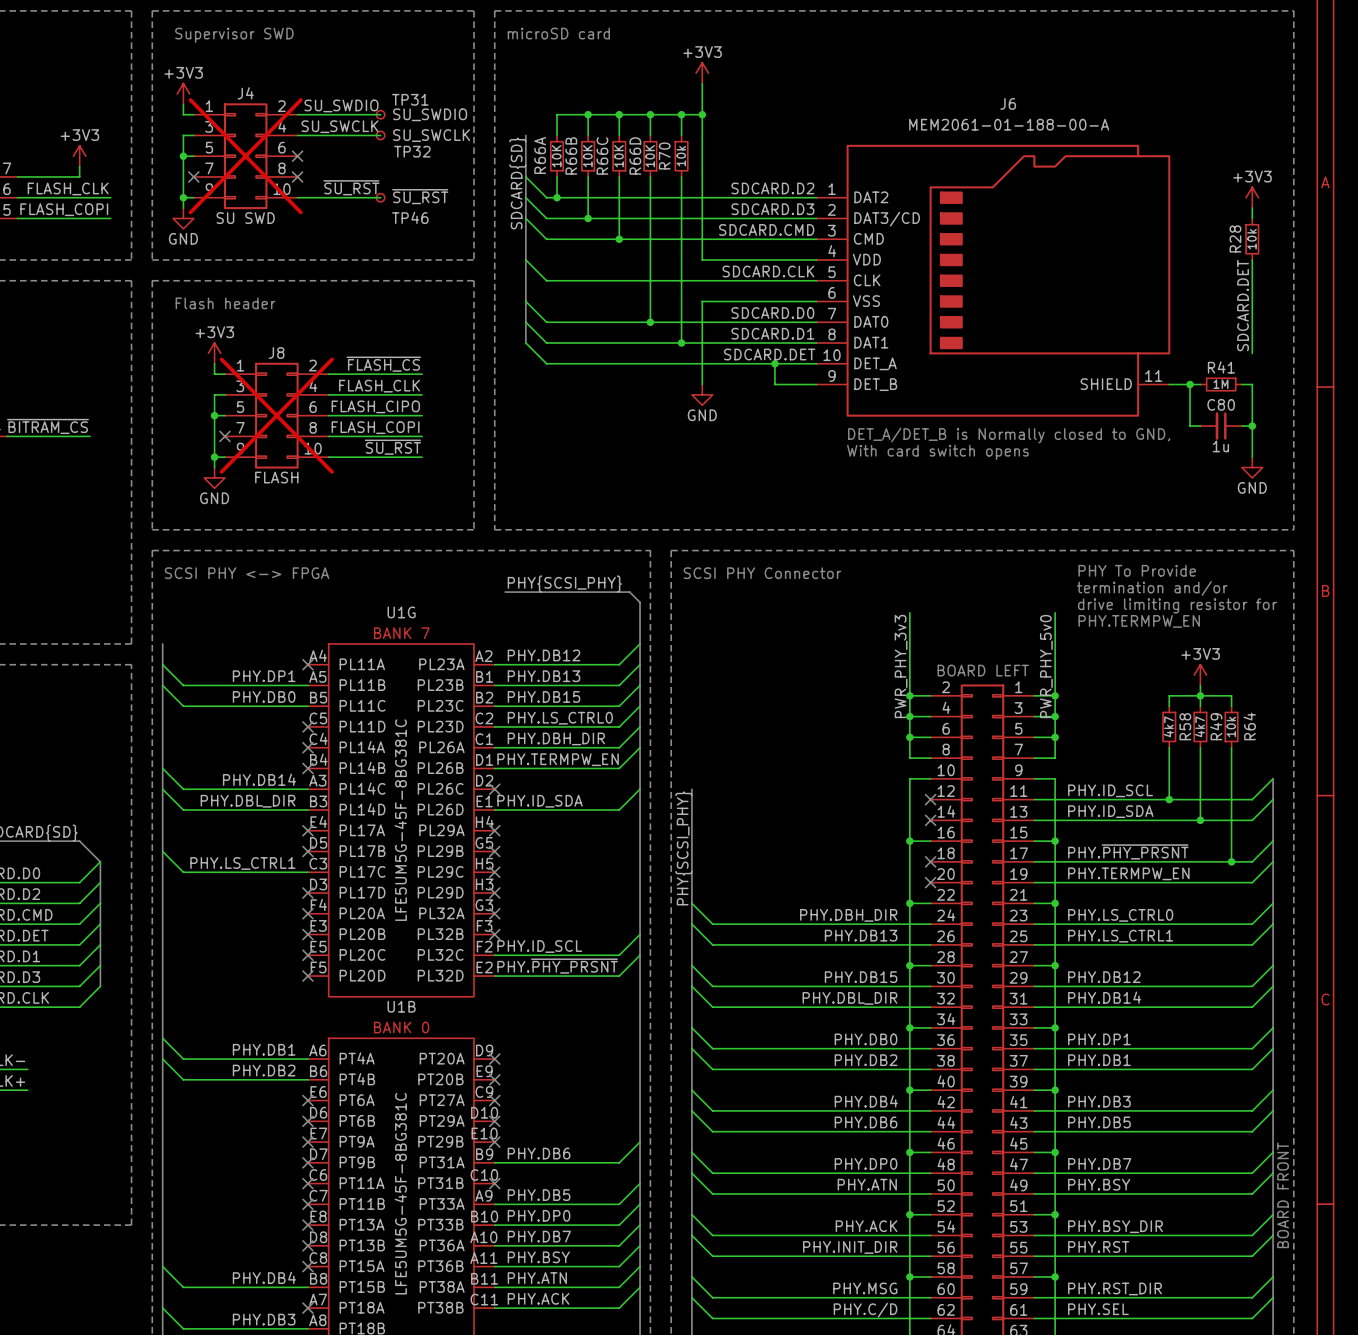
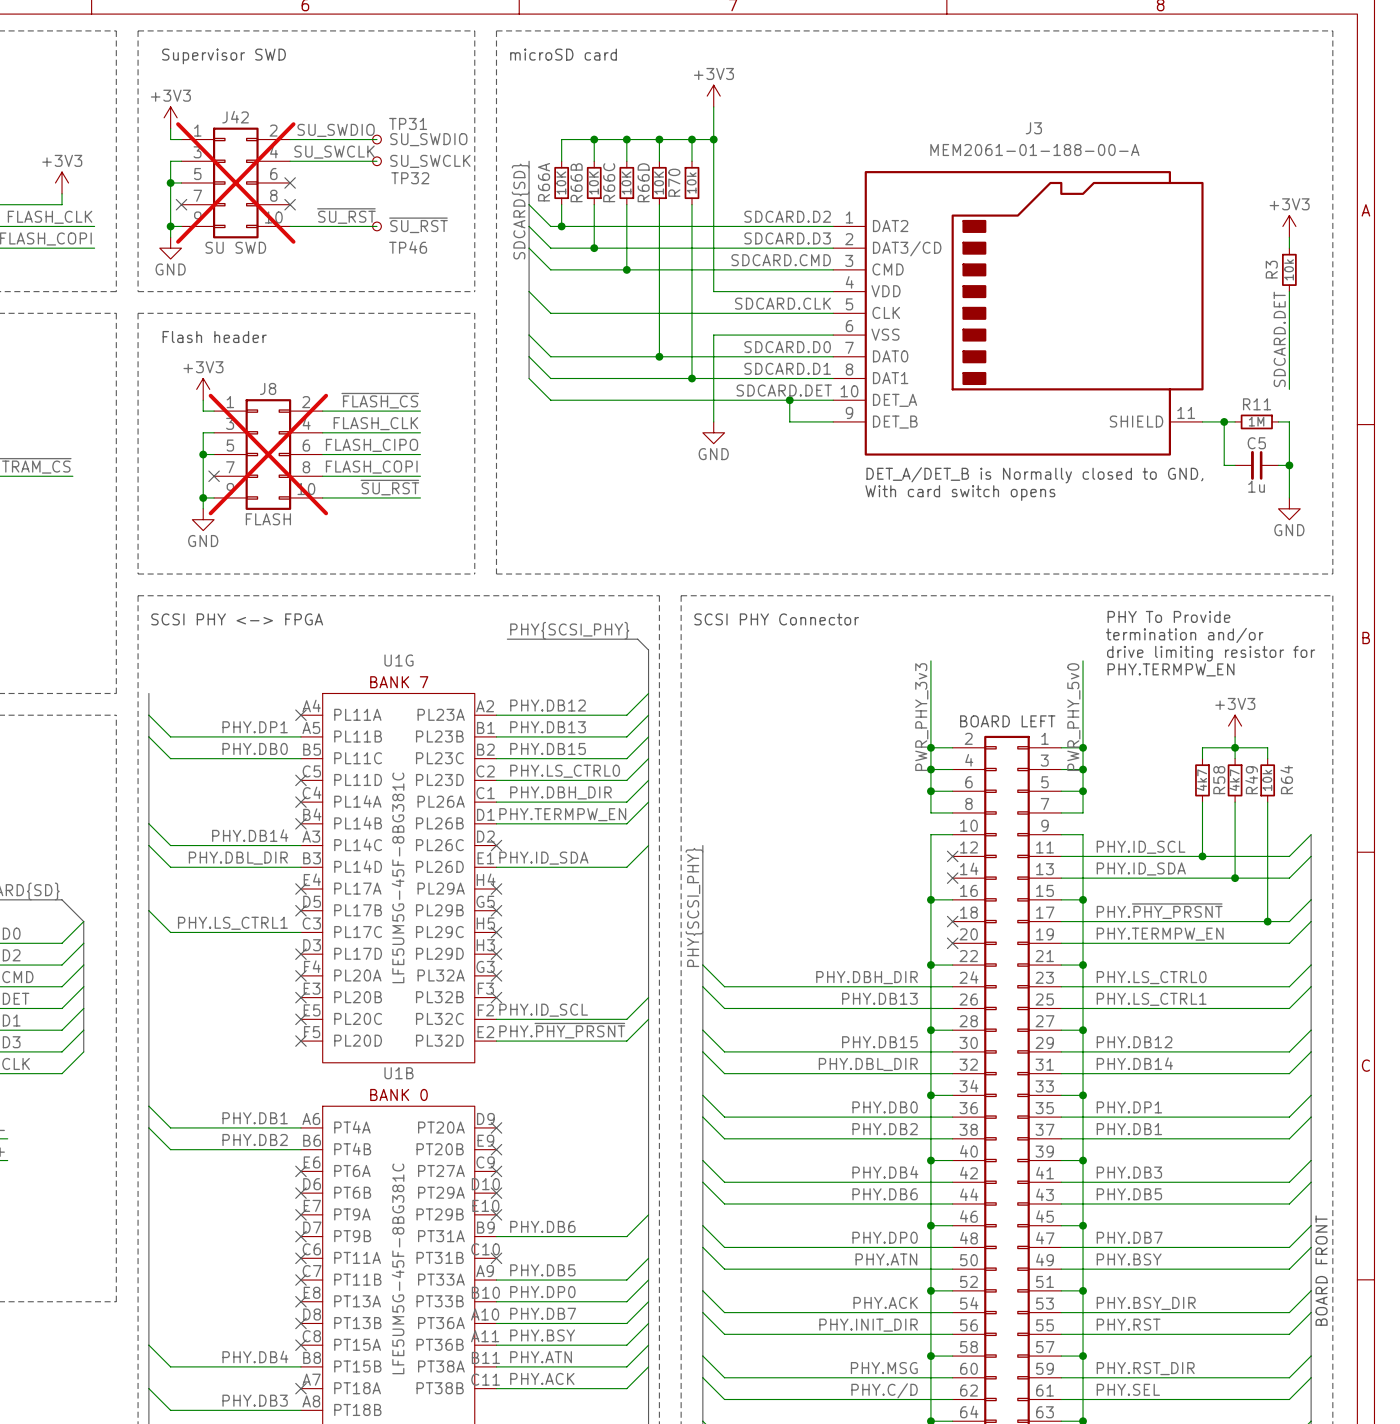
J4 name: J4 (245, 93) -> J42 (235, 117)
J6 name: J6 (1008, 103) -> J3 (1033, 128)
R28 name: R28 (1235, 238) -> R3 (1271, 269)
R41 name: R41 (1221, 367) -> R11 (1257, 404)
C80 name: C80 (1221, 404) -> C5 (1256, 443)

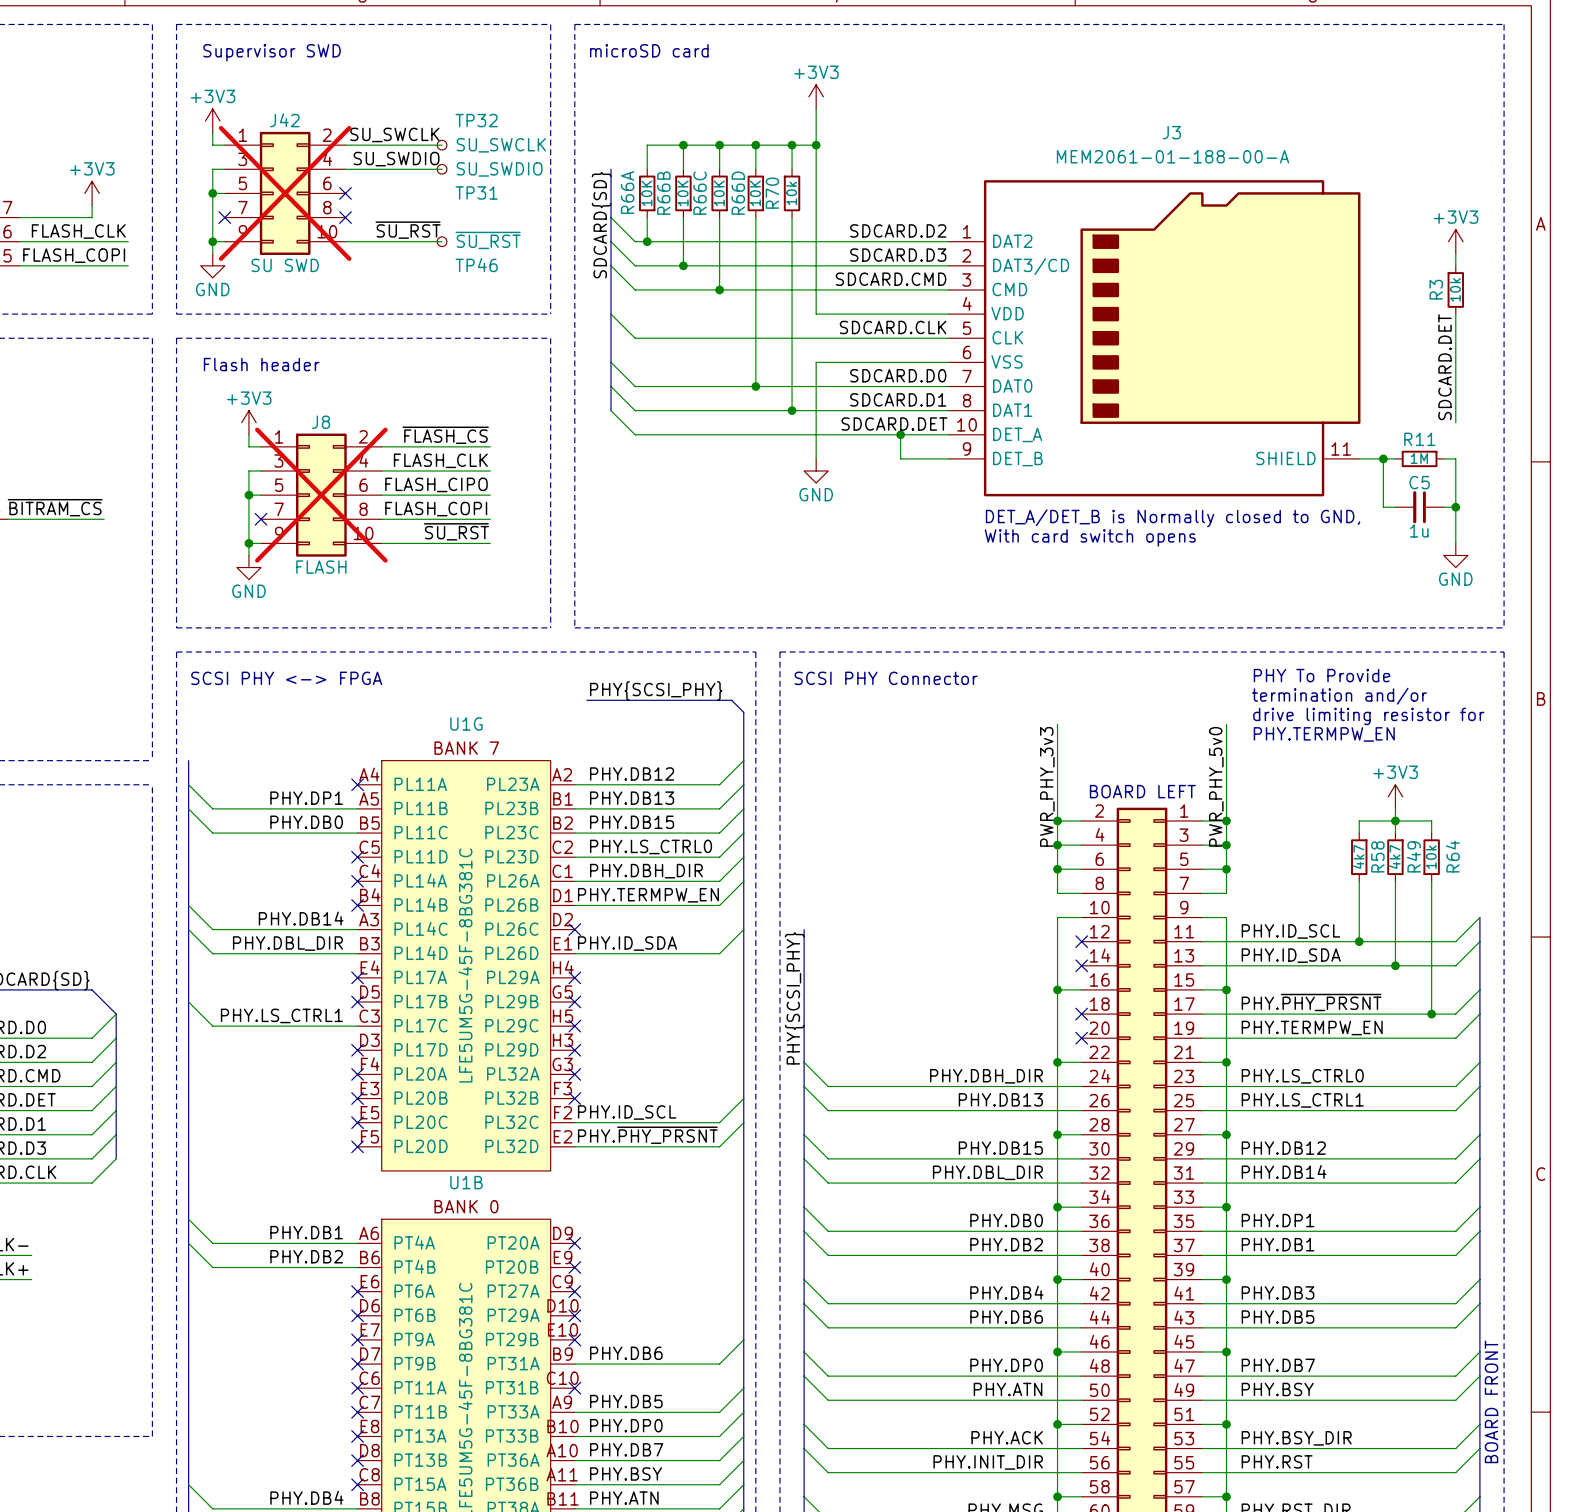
TP31 name: TP31 (408, 123) -> TP32 (476, 120)
label: SU_SWDIO (336, 130) -> SU_SWCLK (394, 134)
TP31 value: SU_SWDIO (428, 139) -> SU_SWCLK (501, 145)
label: SU_SWCLK (334, 152) -> SU_SWDIO (396, 159)
TP32 value: SU_SWCLK (430, 161) -> SU_SWDIO (499, 169)
TP32 name: TP32 (410, 178) -> TP31 (476, 192)

